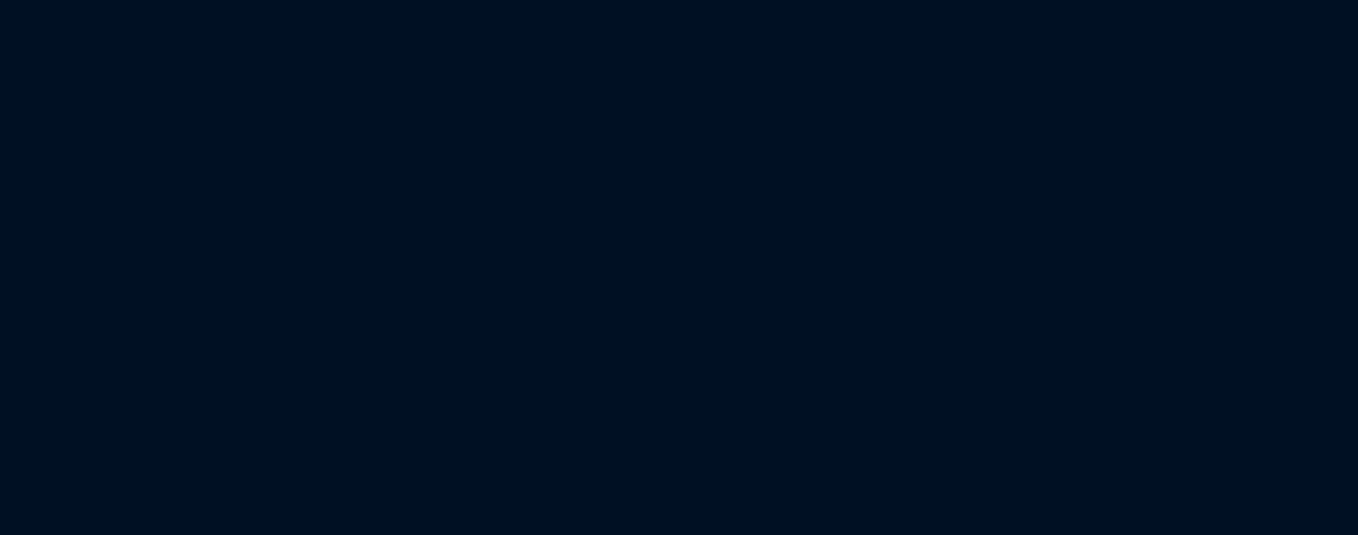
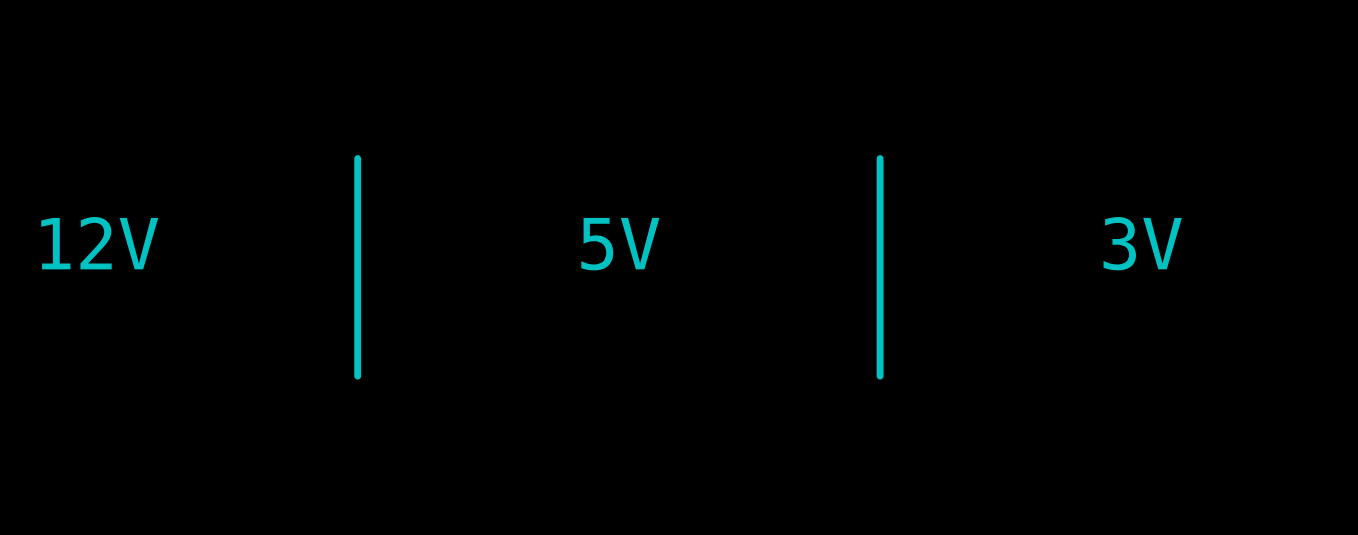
line: none -> (357, 158) (357, 376)
line: none -> (880, 158) (880, 376)
text: none -> 12V (99, 243)
text: none -> 5V (620, 244)
text: none -> 3V (1142, 243)

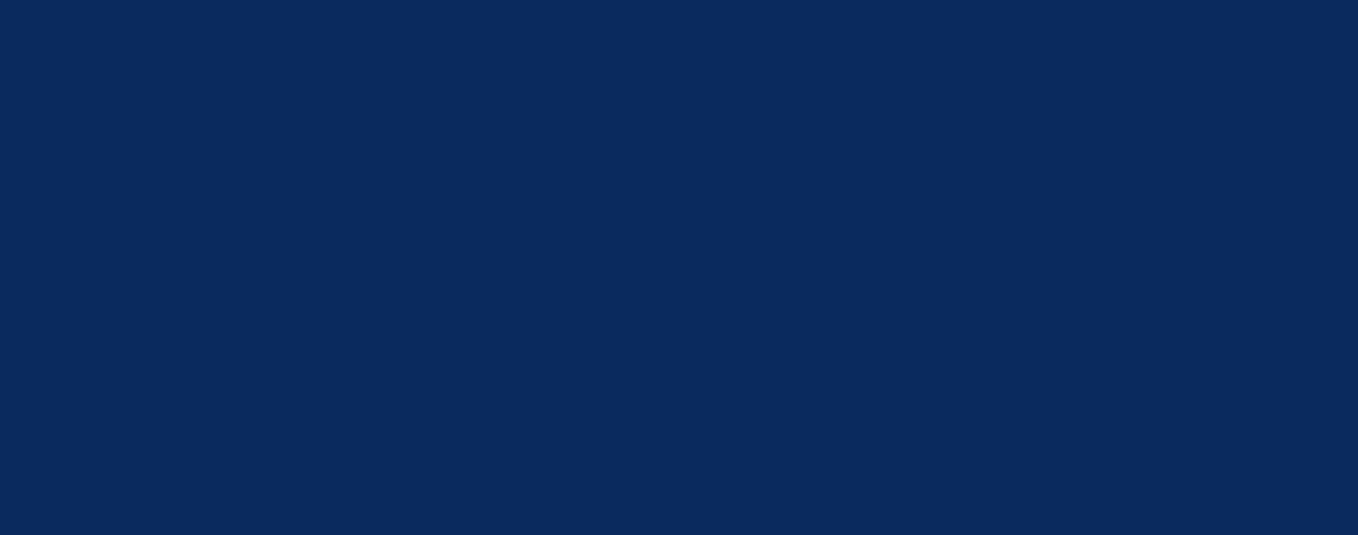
line: (357, 158) (357, 376) -> none
line: (880, 158) (880, 376) -> none
text: 12V (99, 243) -> none
text: 3V (1142, 243) -> none
text: 5V (620, 244) -> none

